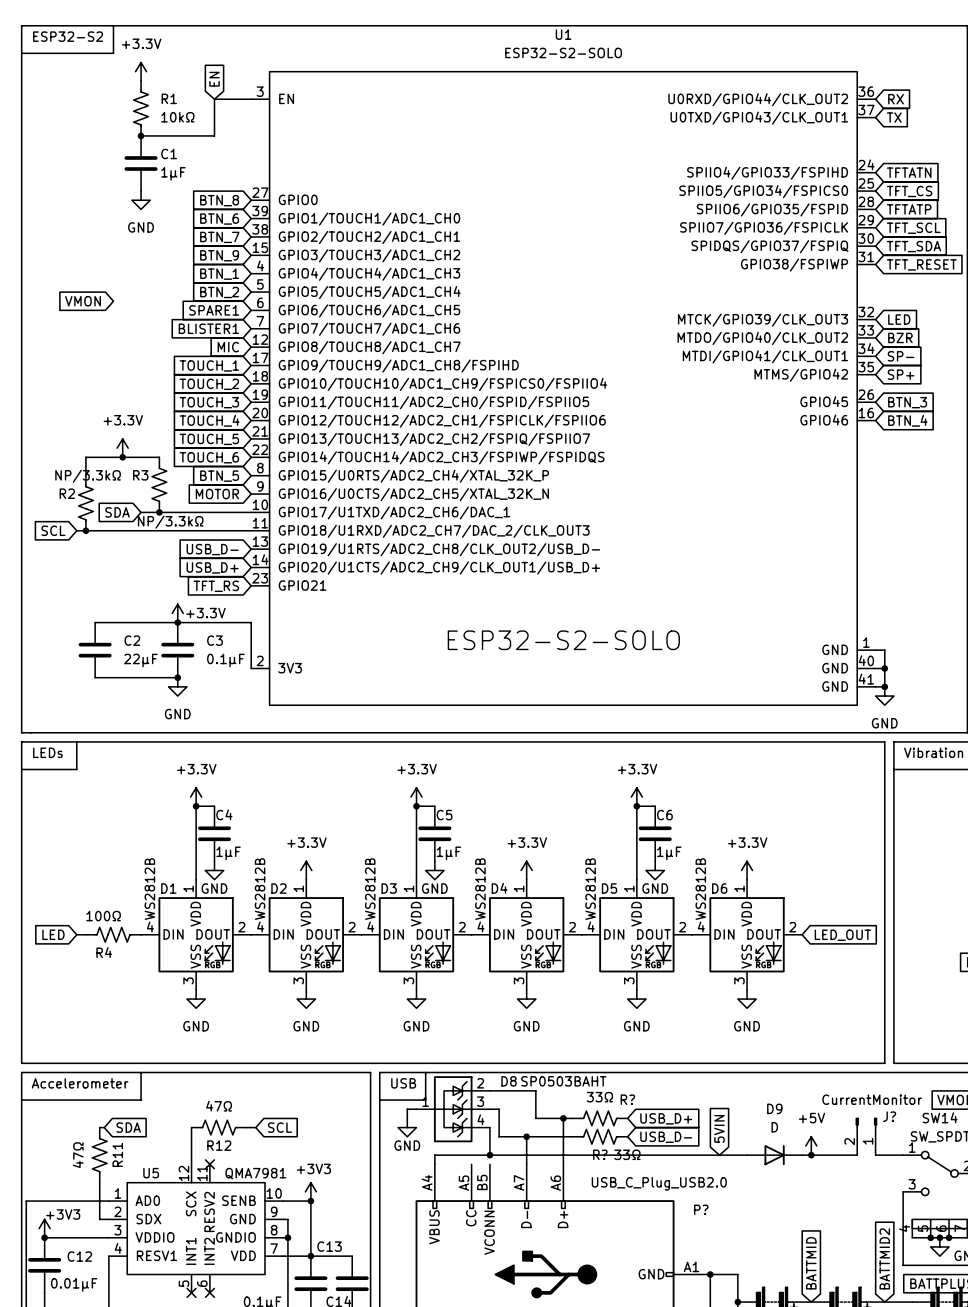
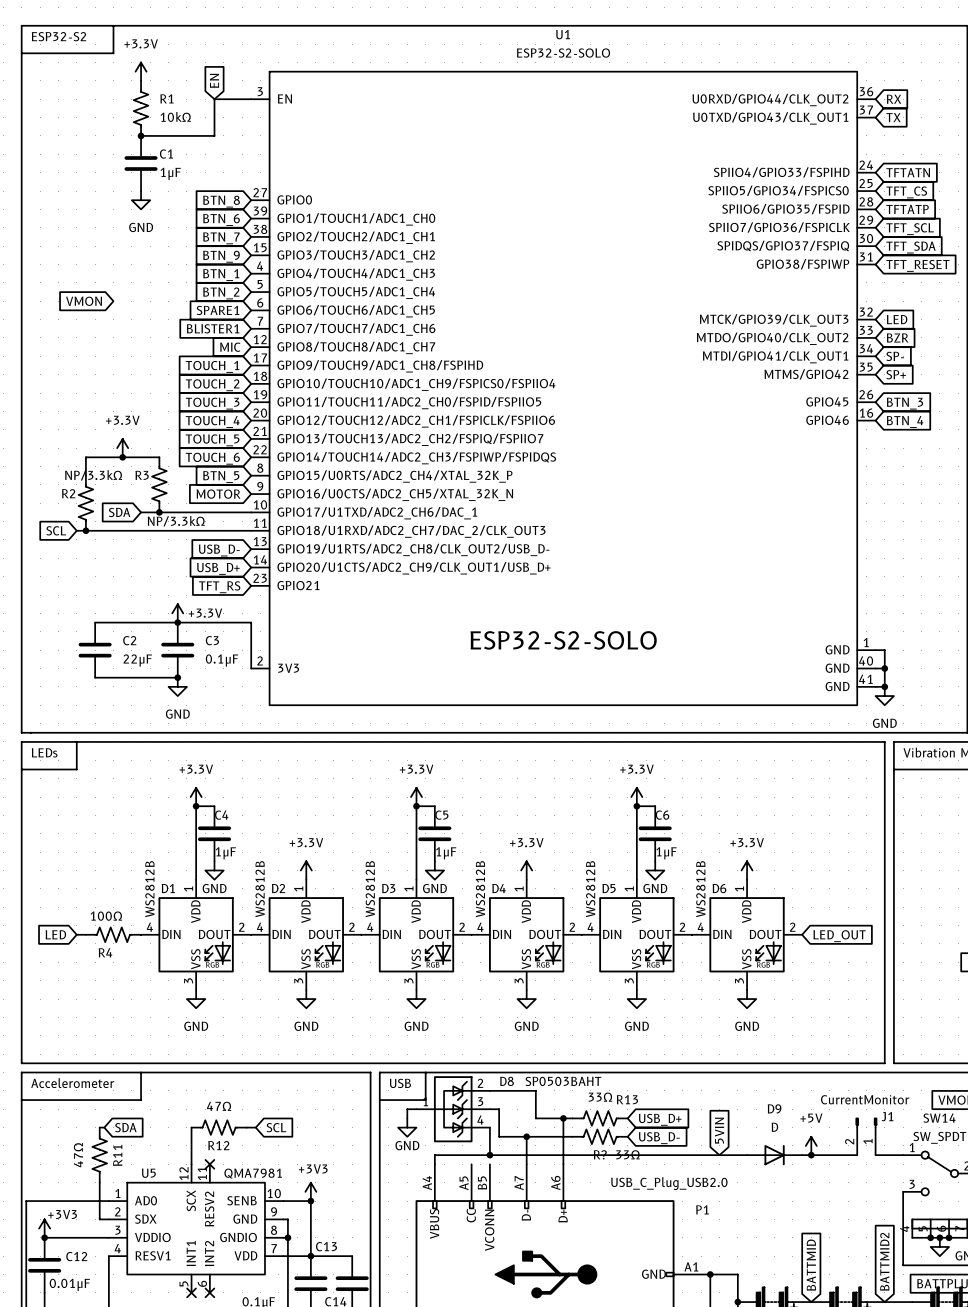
R? name: R? (627, 1099) -> R13 (627, 1099)
J? name: J? (889, 1116) -> J1 (887, 1116)
P? name: P? (701, 1209) -> P1 (702, 1209)

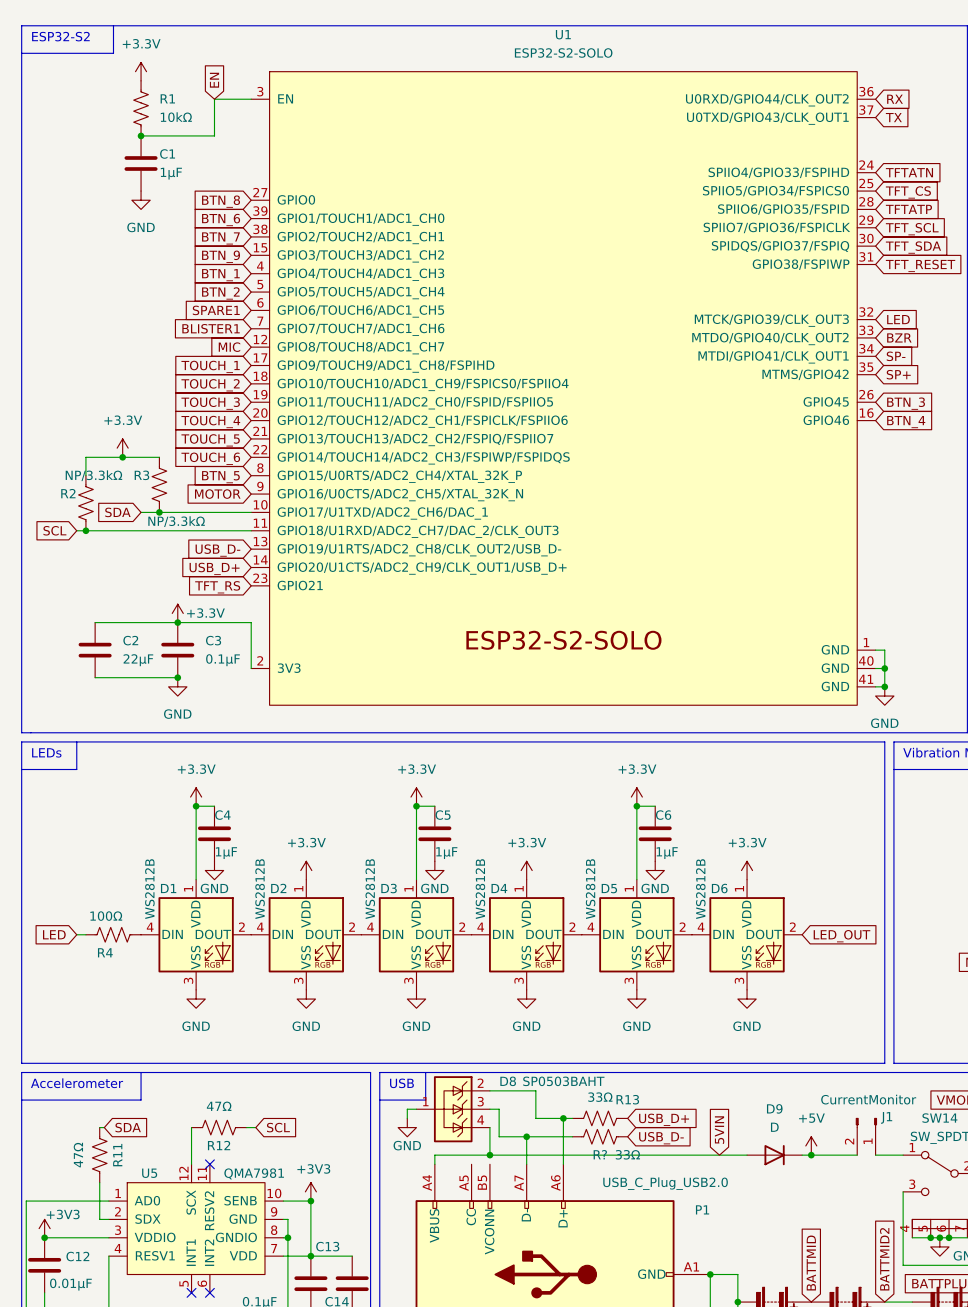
global label: VMON (84, 301) -> none

